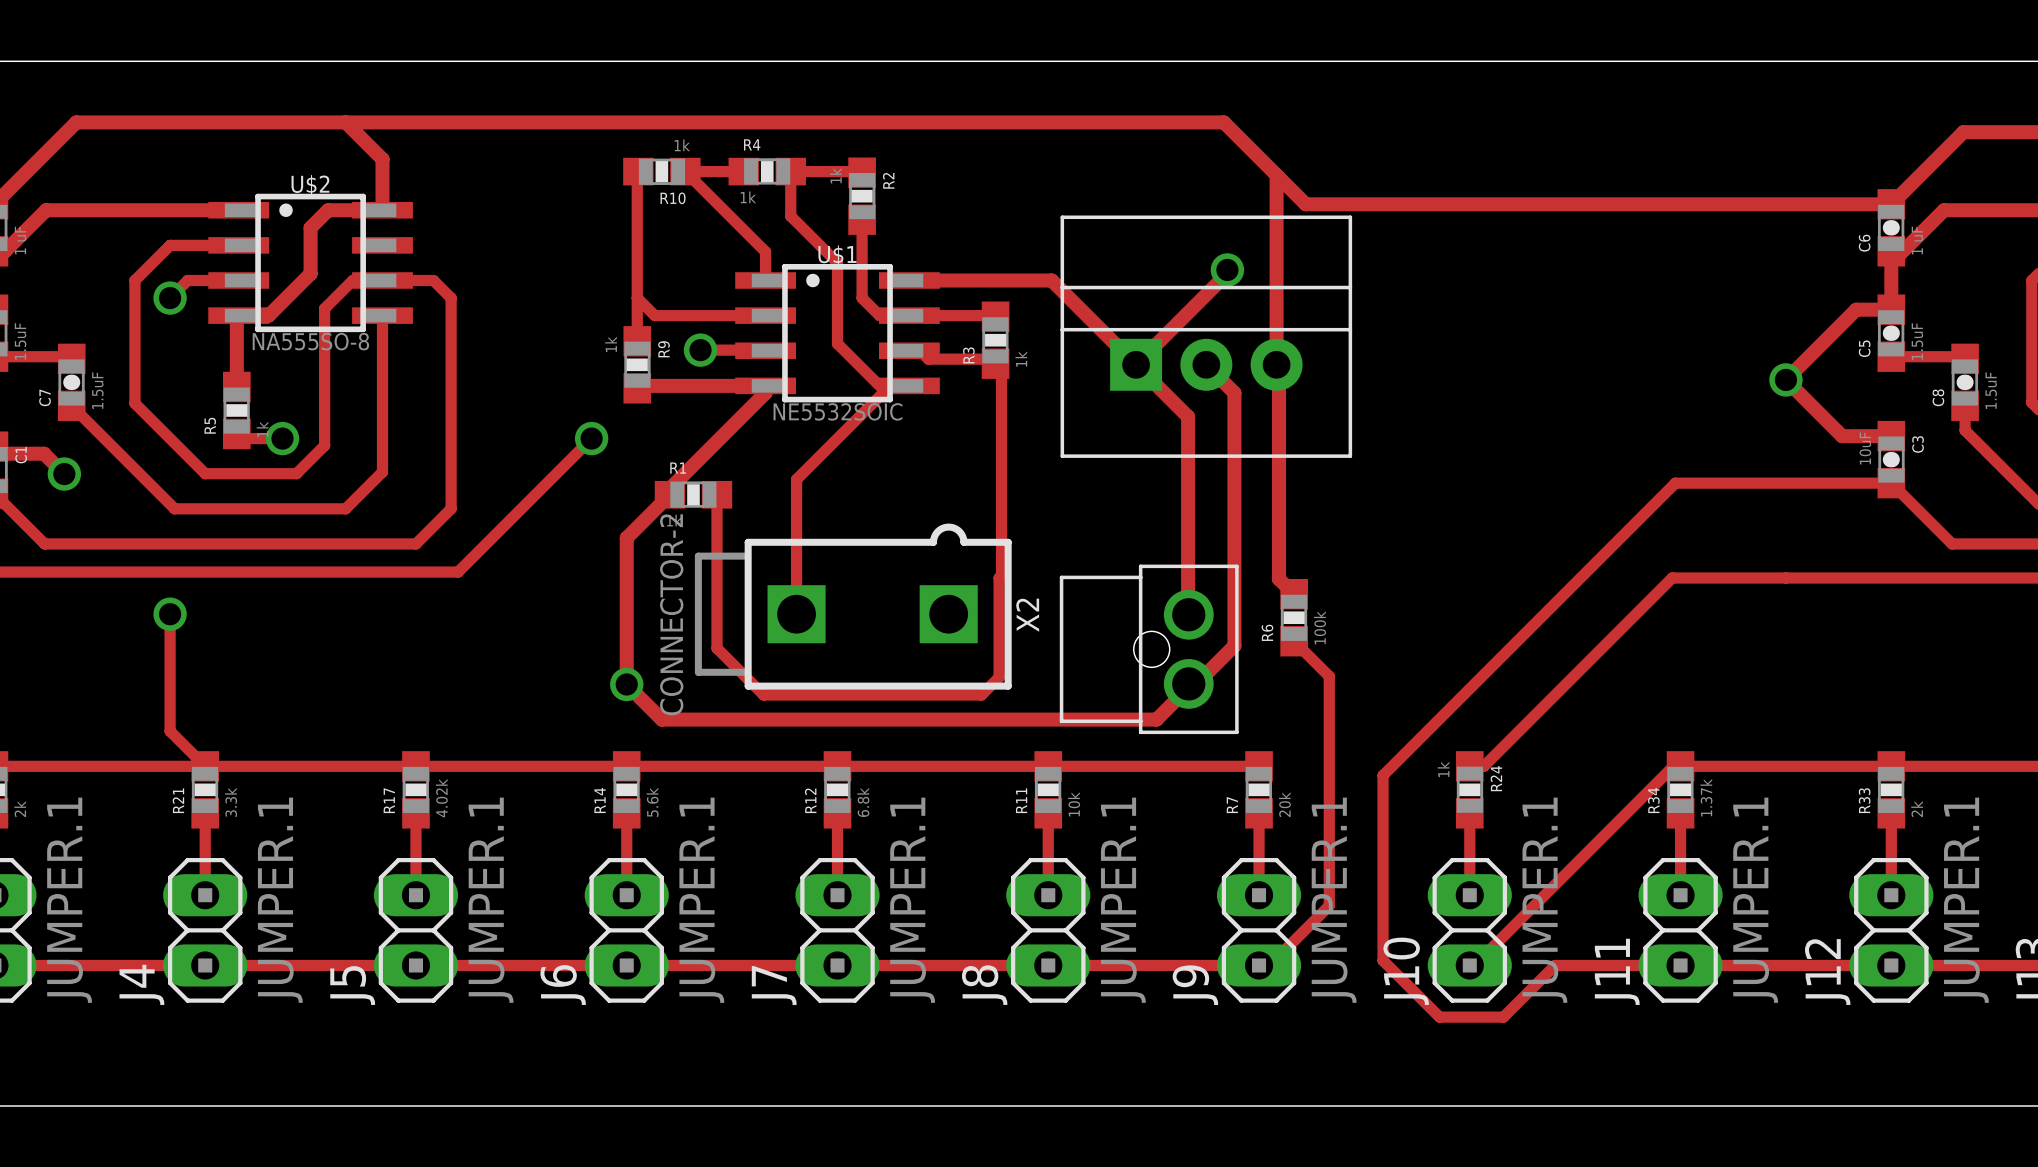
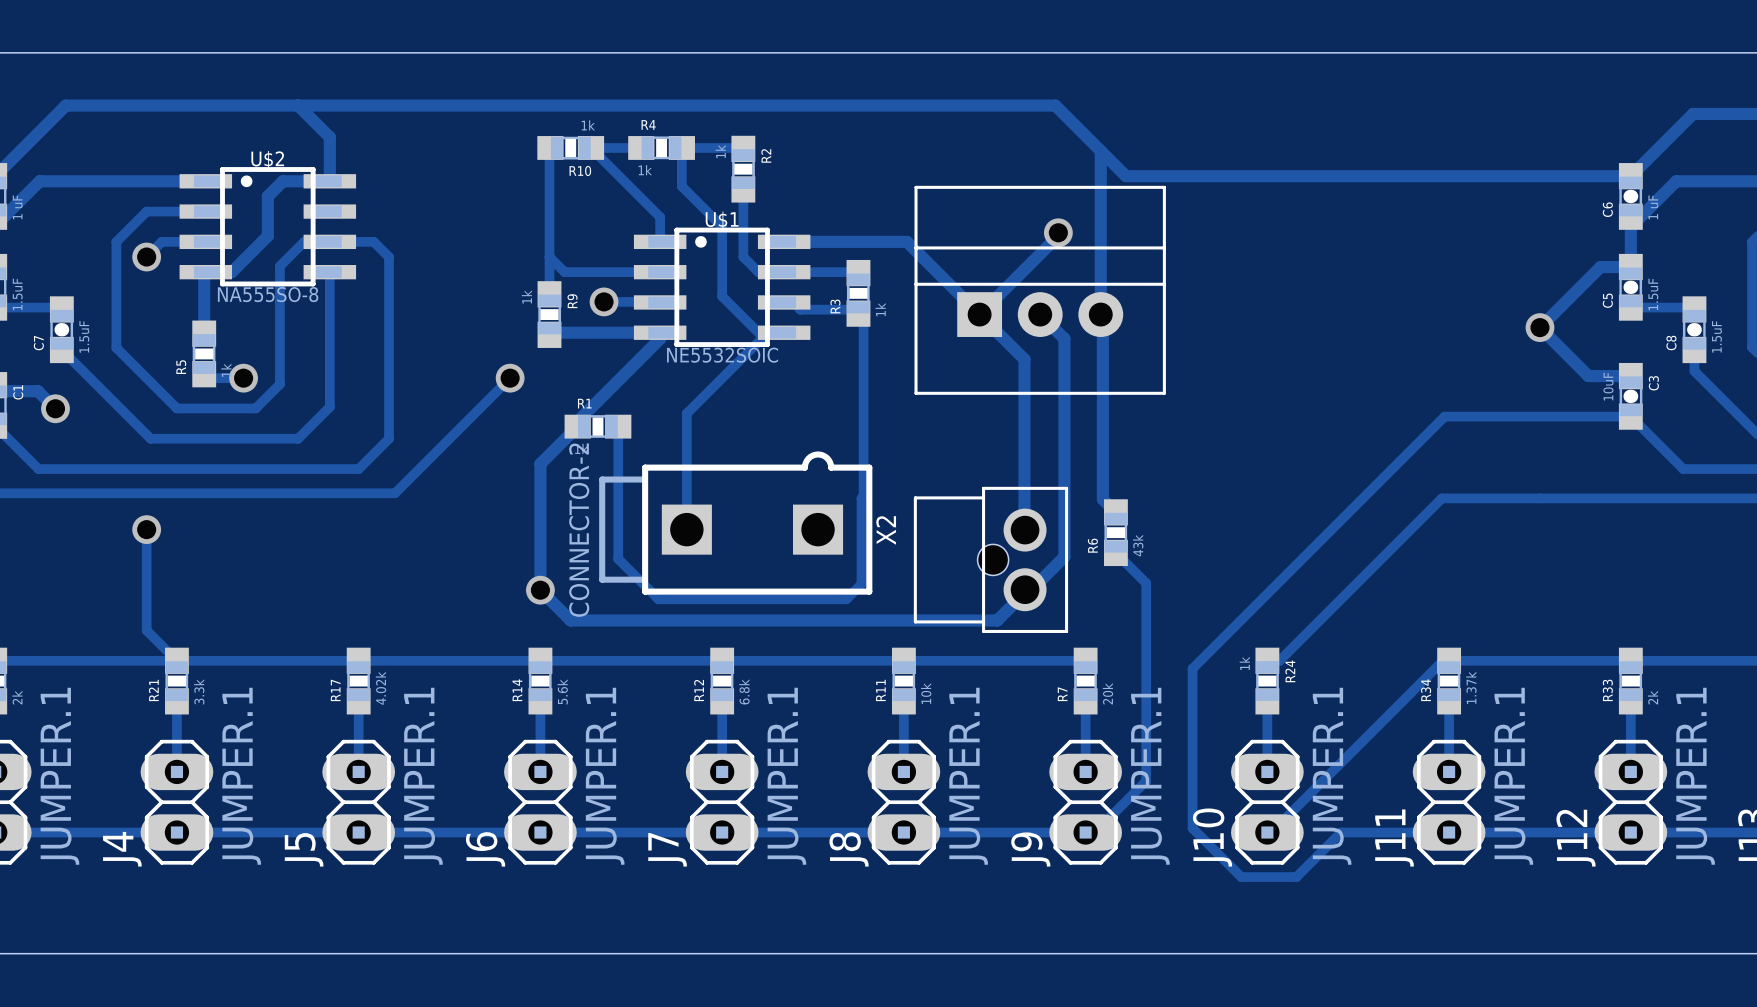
R6 value: 100k (1320, 627) -> 43k (1138, 545)

